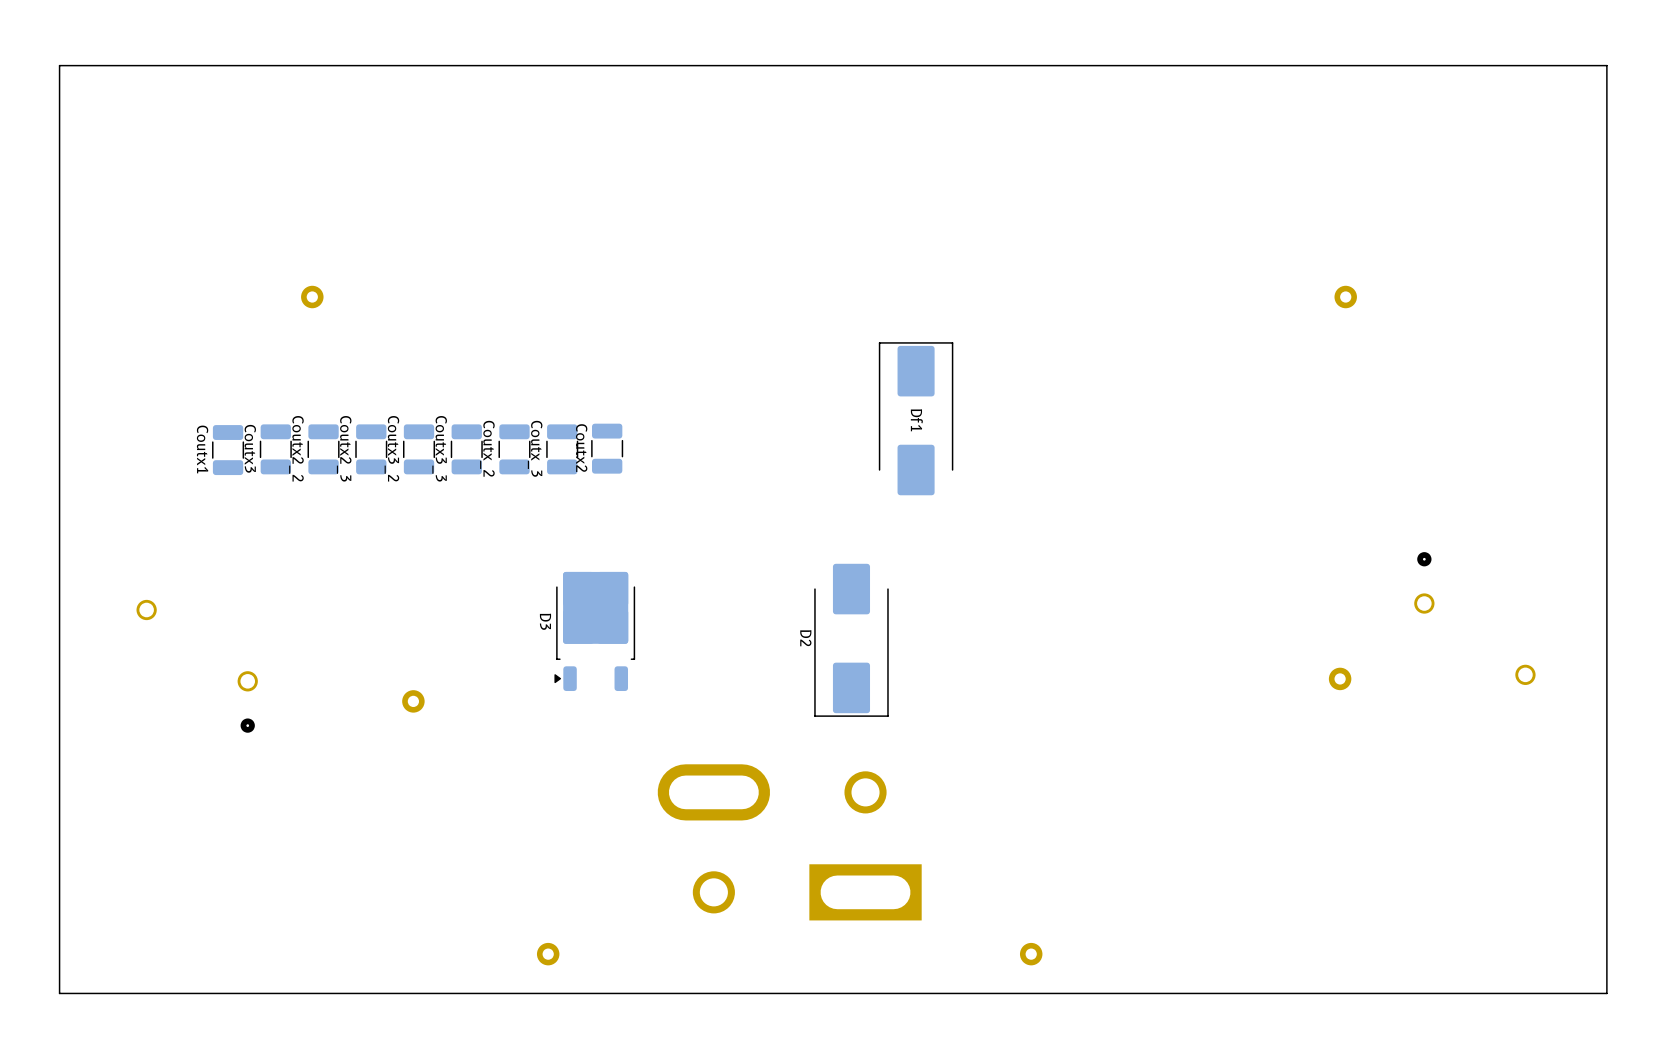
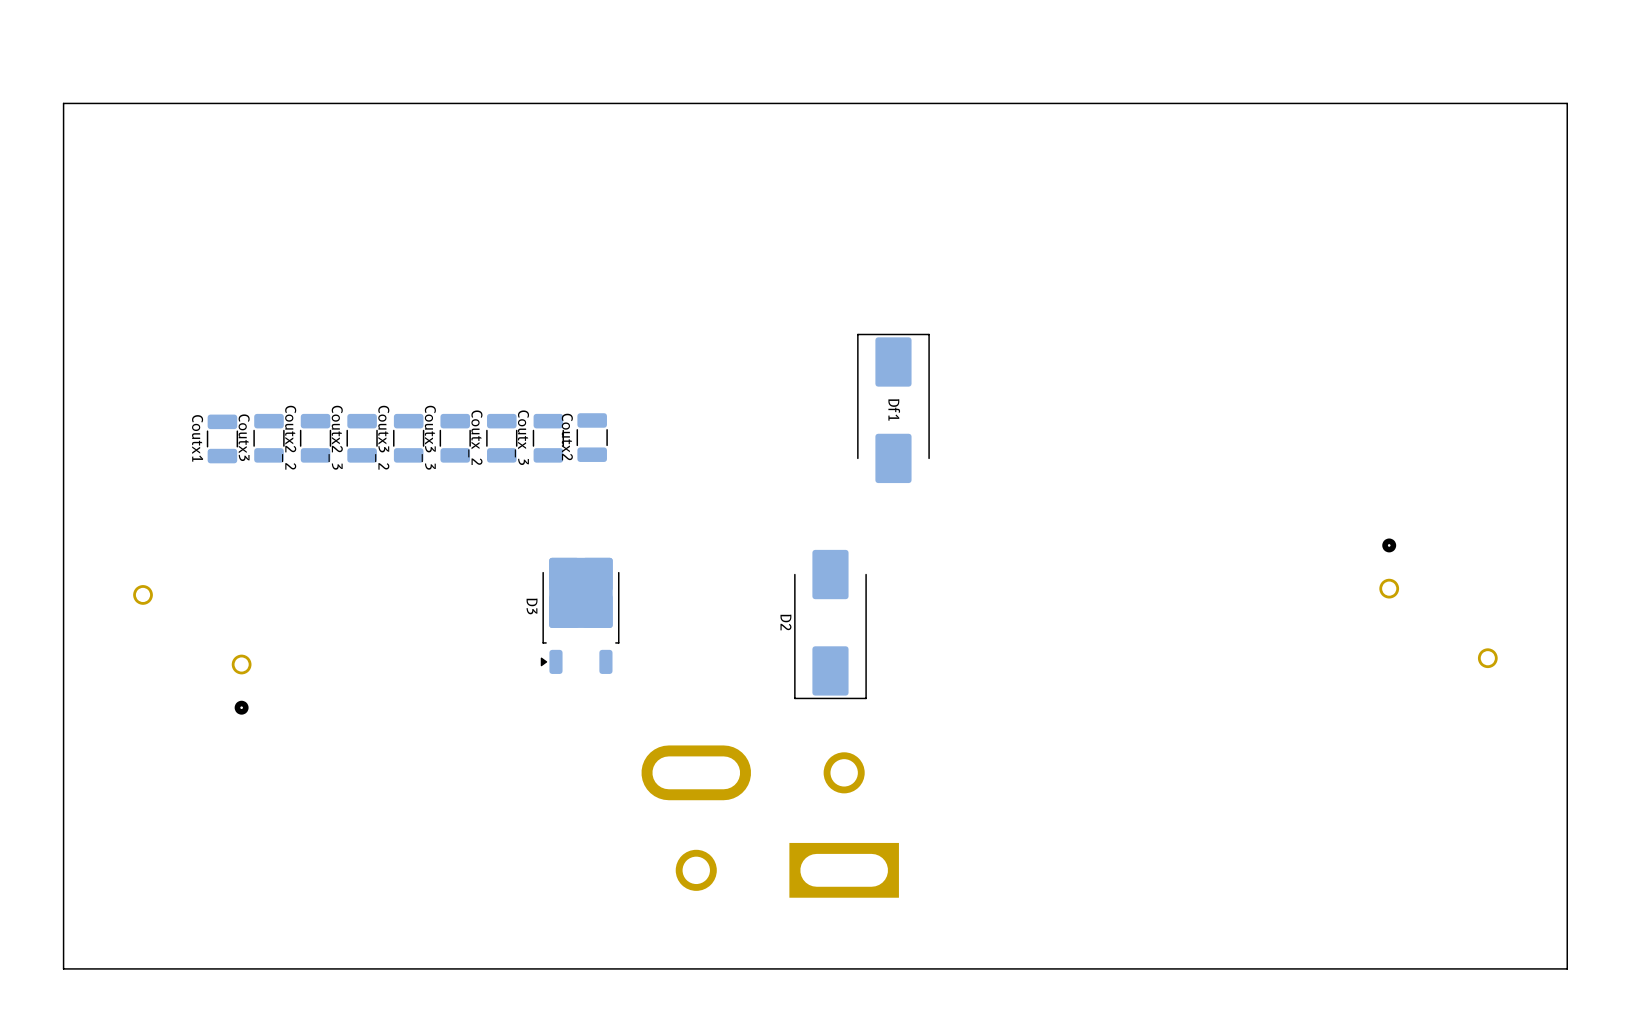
board edge: (1606, 106) (1606, 65) (59, 65) (59, 993) (65, 993) -> (1567, 103) (63, 103) (63, 968)
part: (312, 297) -> none
part: (1345, 297) -> none
part: (1340, 678) -> none
part: (413, 701) -> none
part: (548, 954) -> none
part: (1031, 954) -> none

